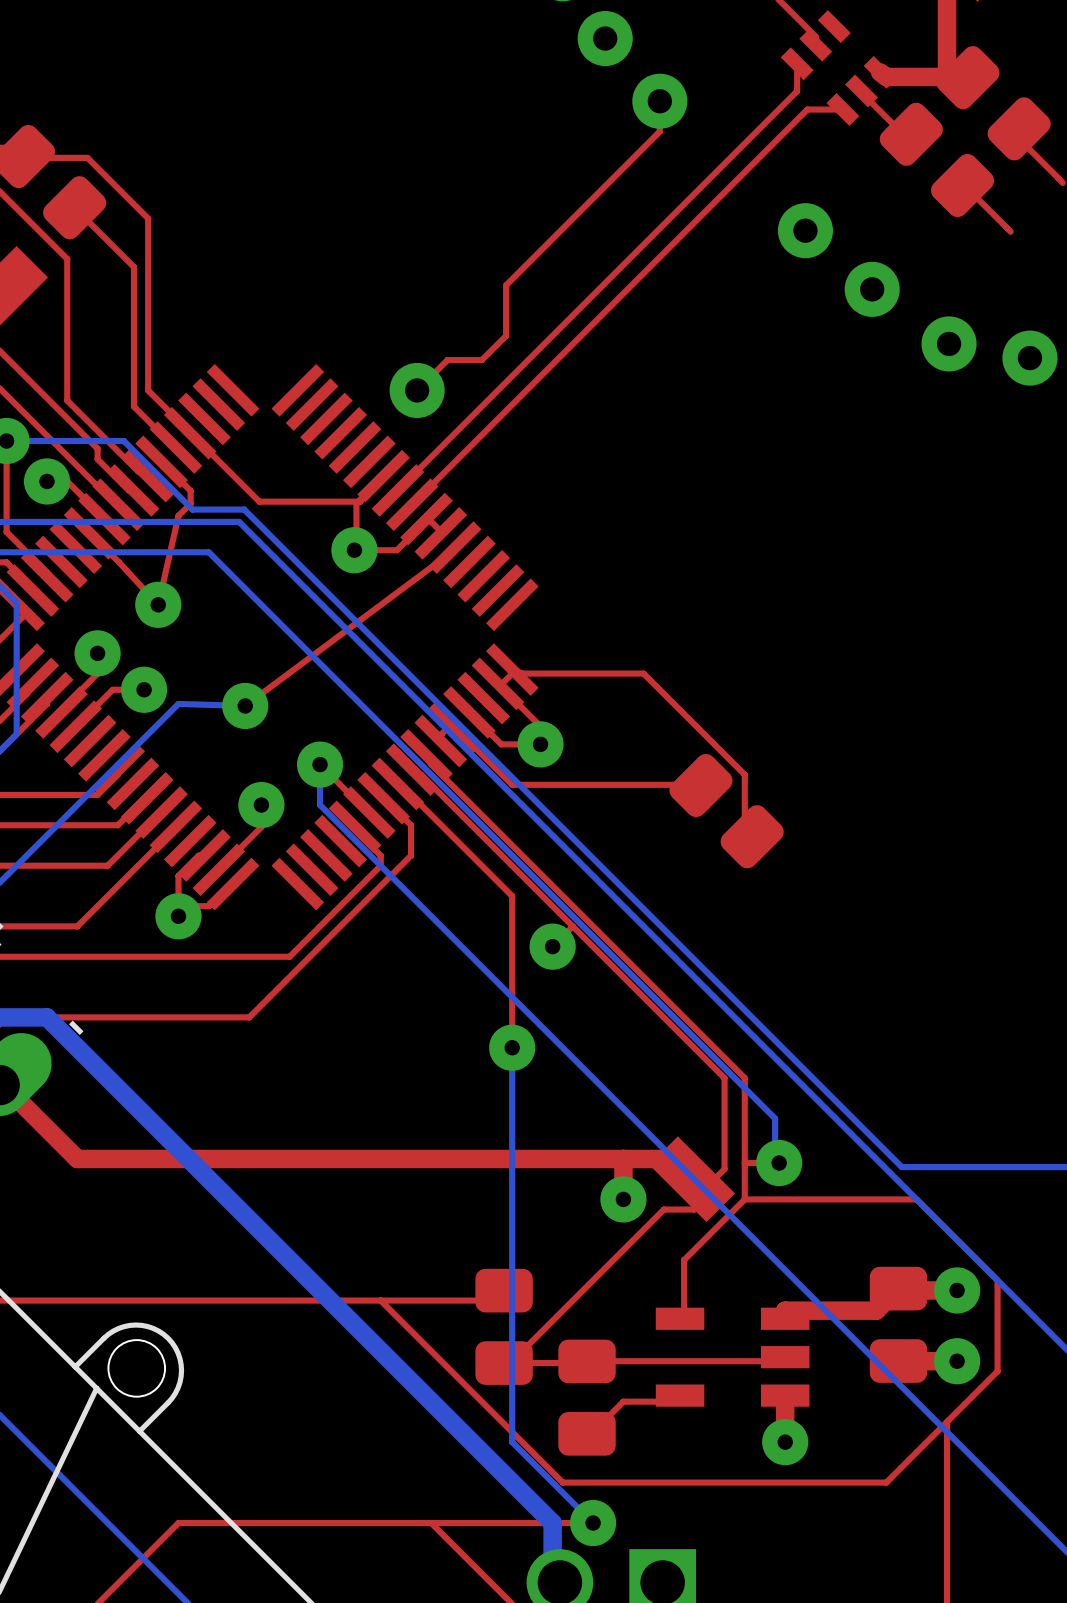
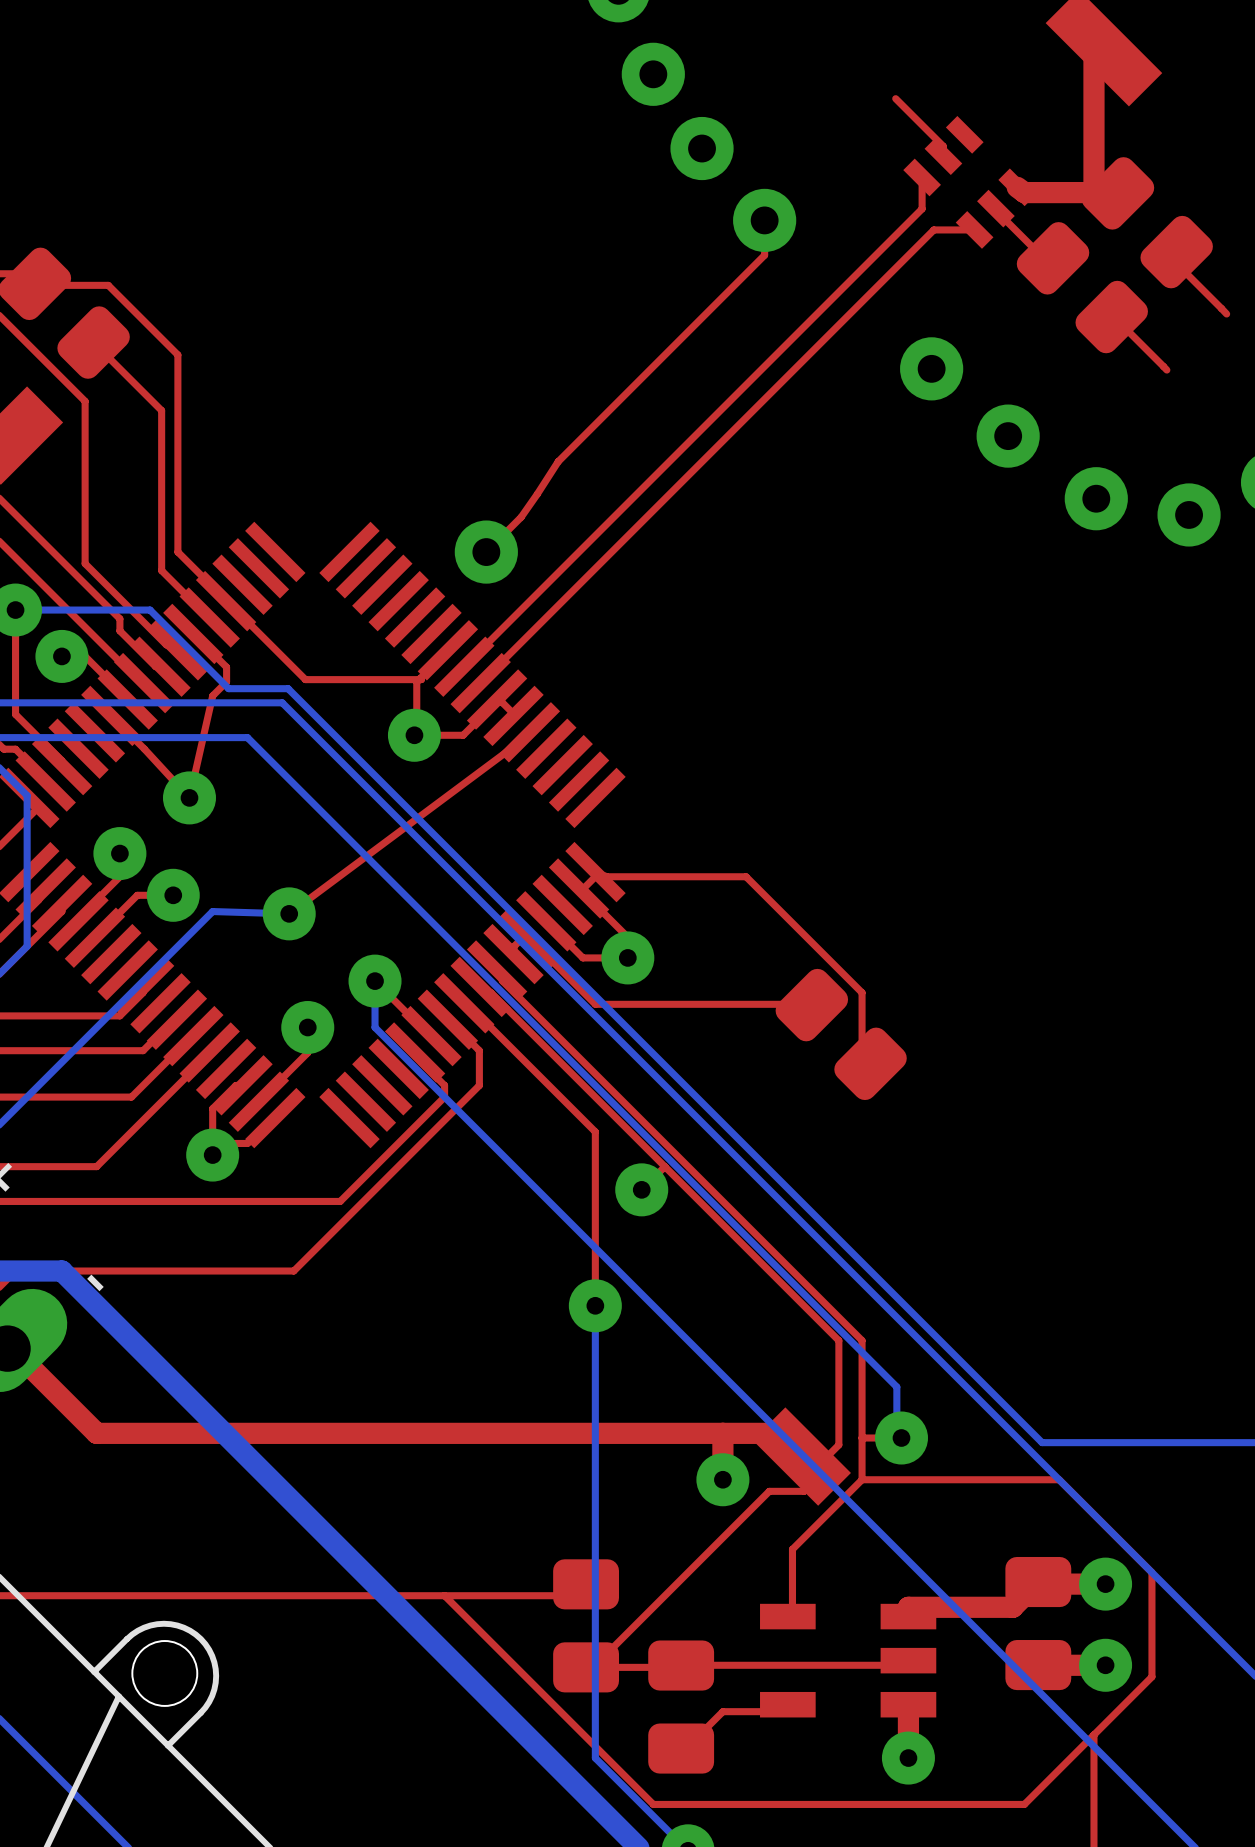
top track: (506, 285) (506, 335) (481, 360) (447, 360) -> (588, 431) (558, 461) (521, 517)

